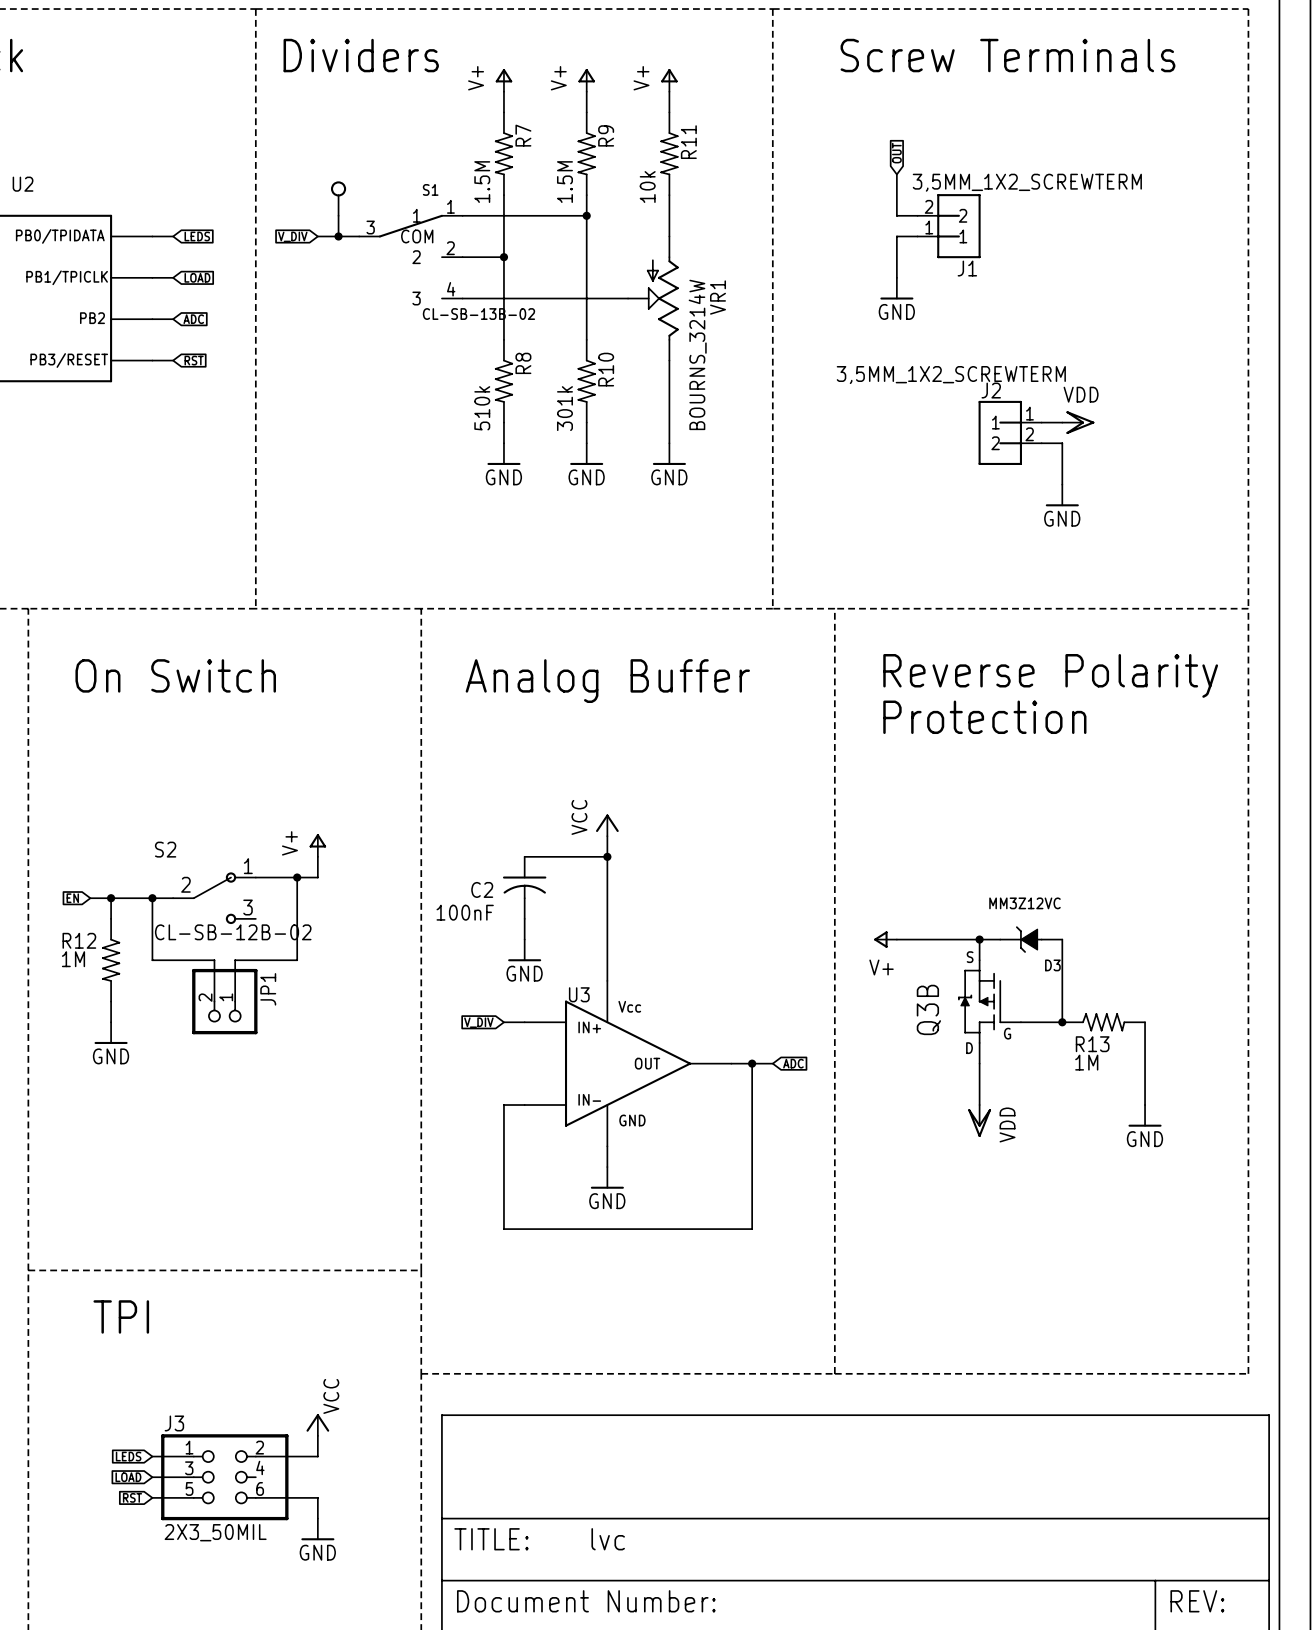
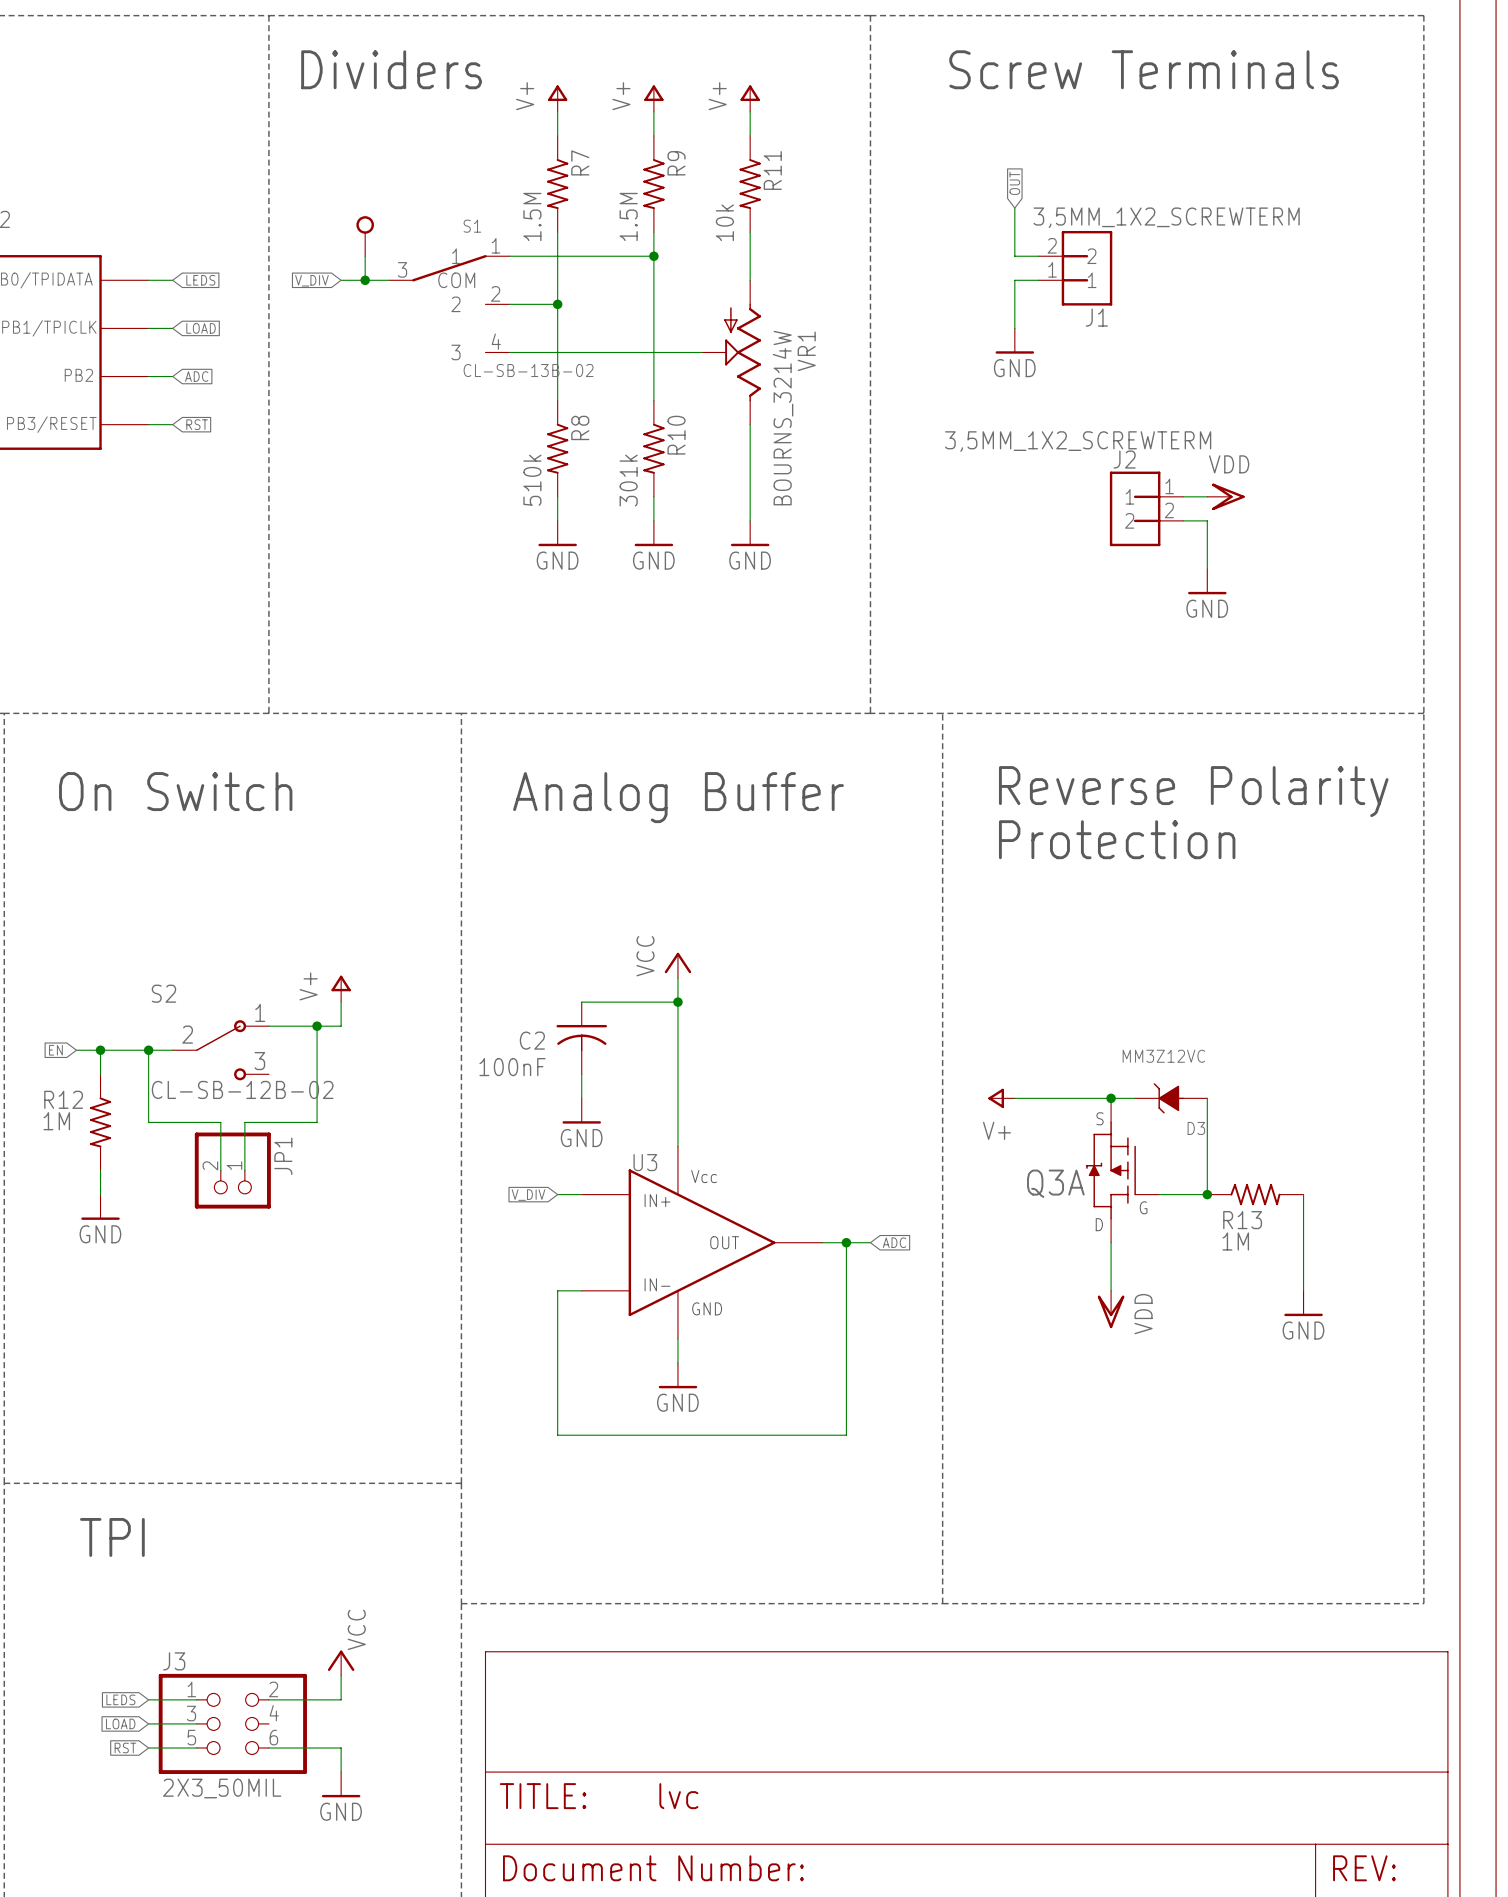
Q3B name: Q3B (928, 1009) -> Q3A (1055, 1183)

